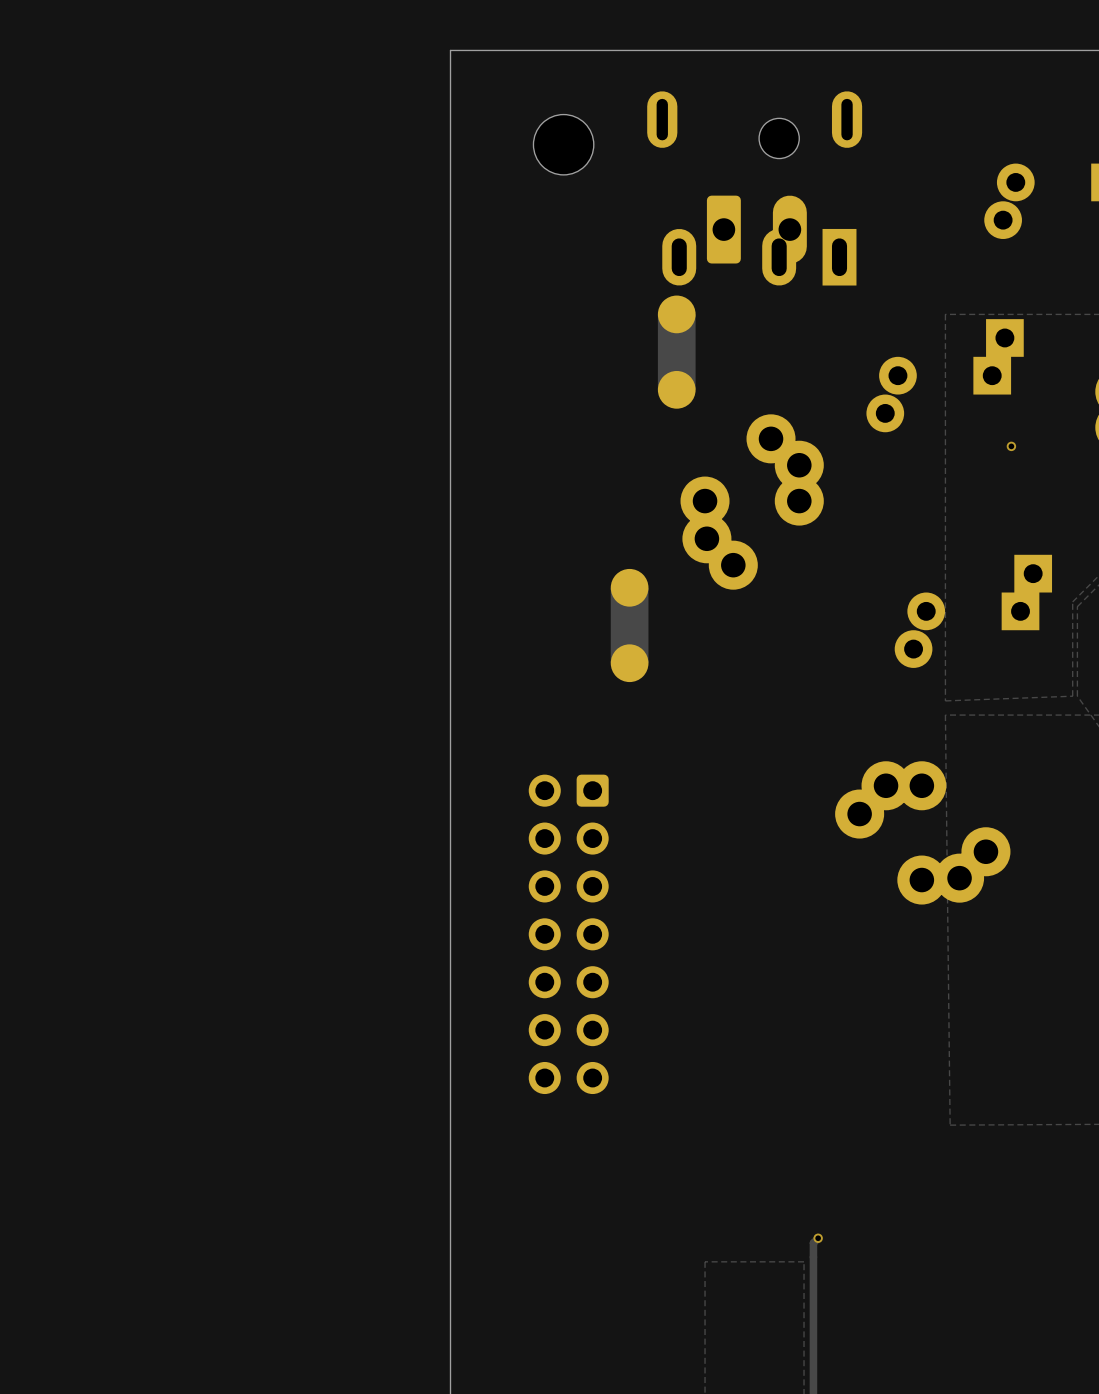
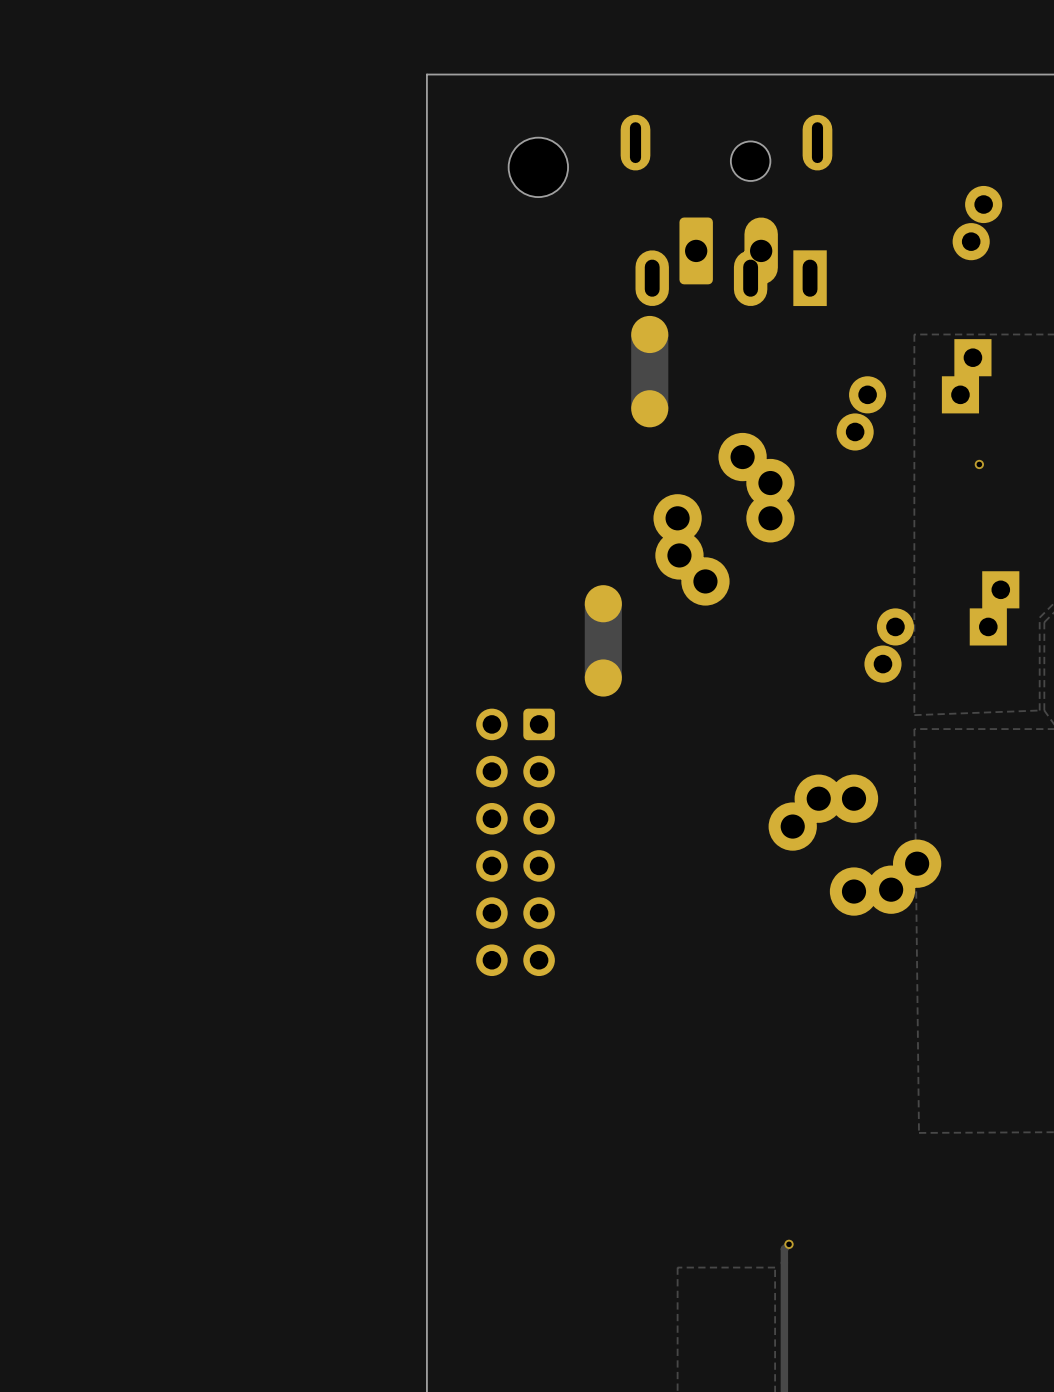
part: none -> (515, 842)
part position: (922, 832) -> (854, 845)
part: (568, 934) -> none

